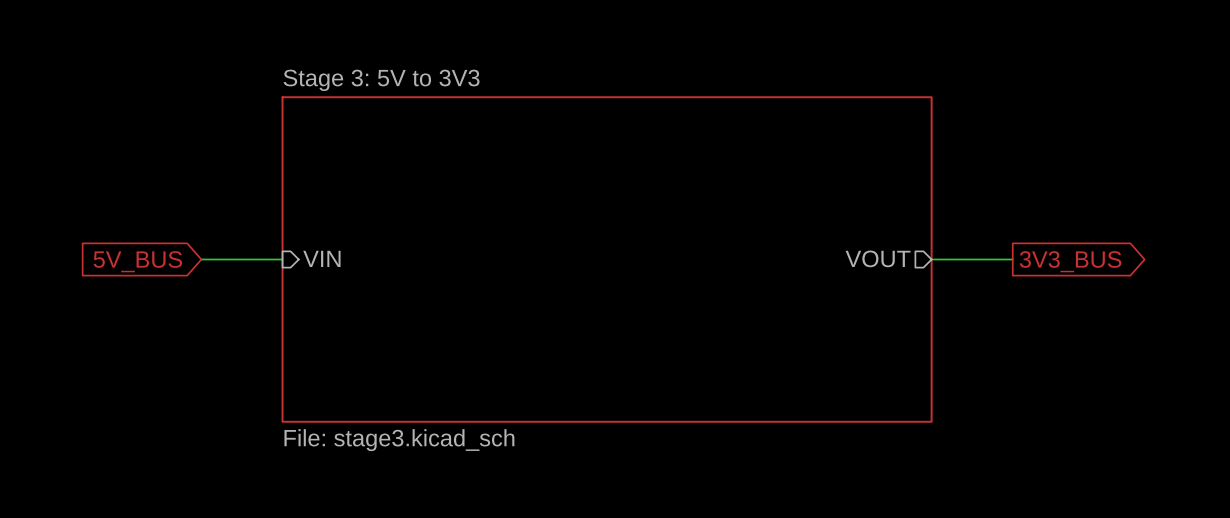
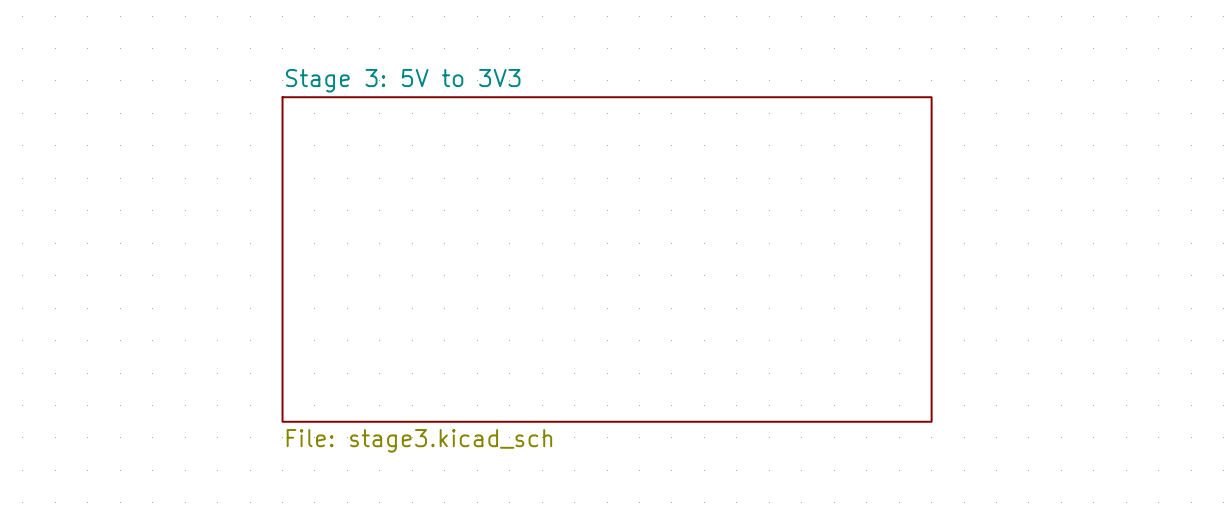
sheet pin: VIN (321, 258) -> none
sheet pin: VOUT (878, 258) -> none
wire: (201, 259) (282, 259) -> none
wire: (931, 259) (1012, 259) -> none
global label: 5V_BUS (137, 261) -> none
global label: 3V3_BUS (1070, 261) -> none

